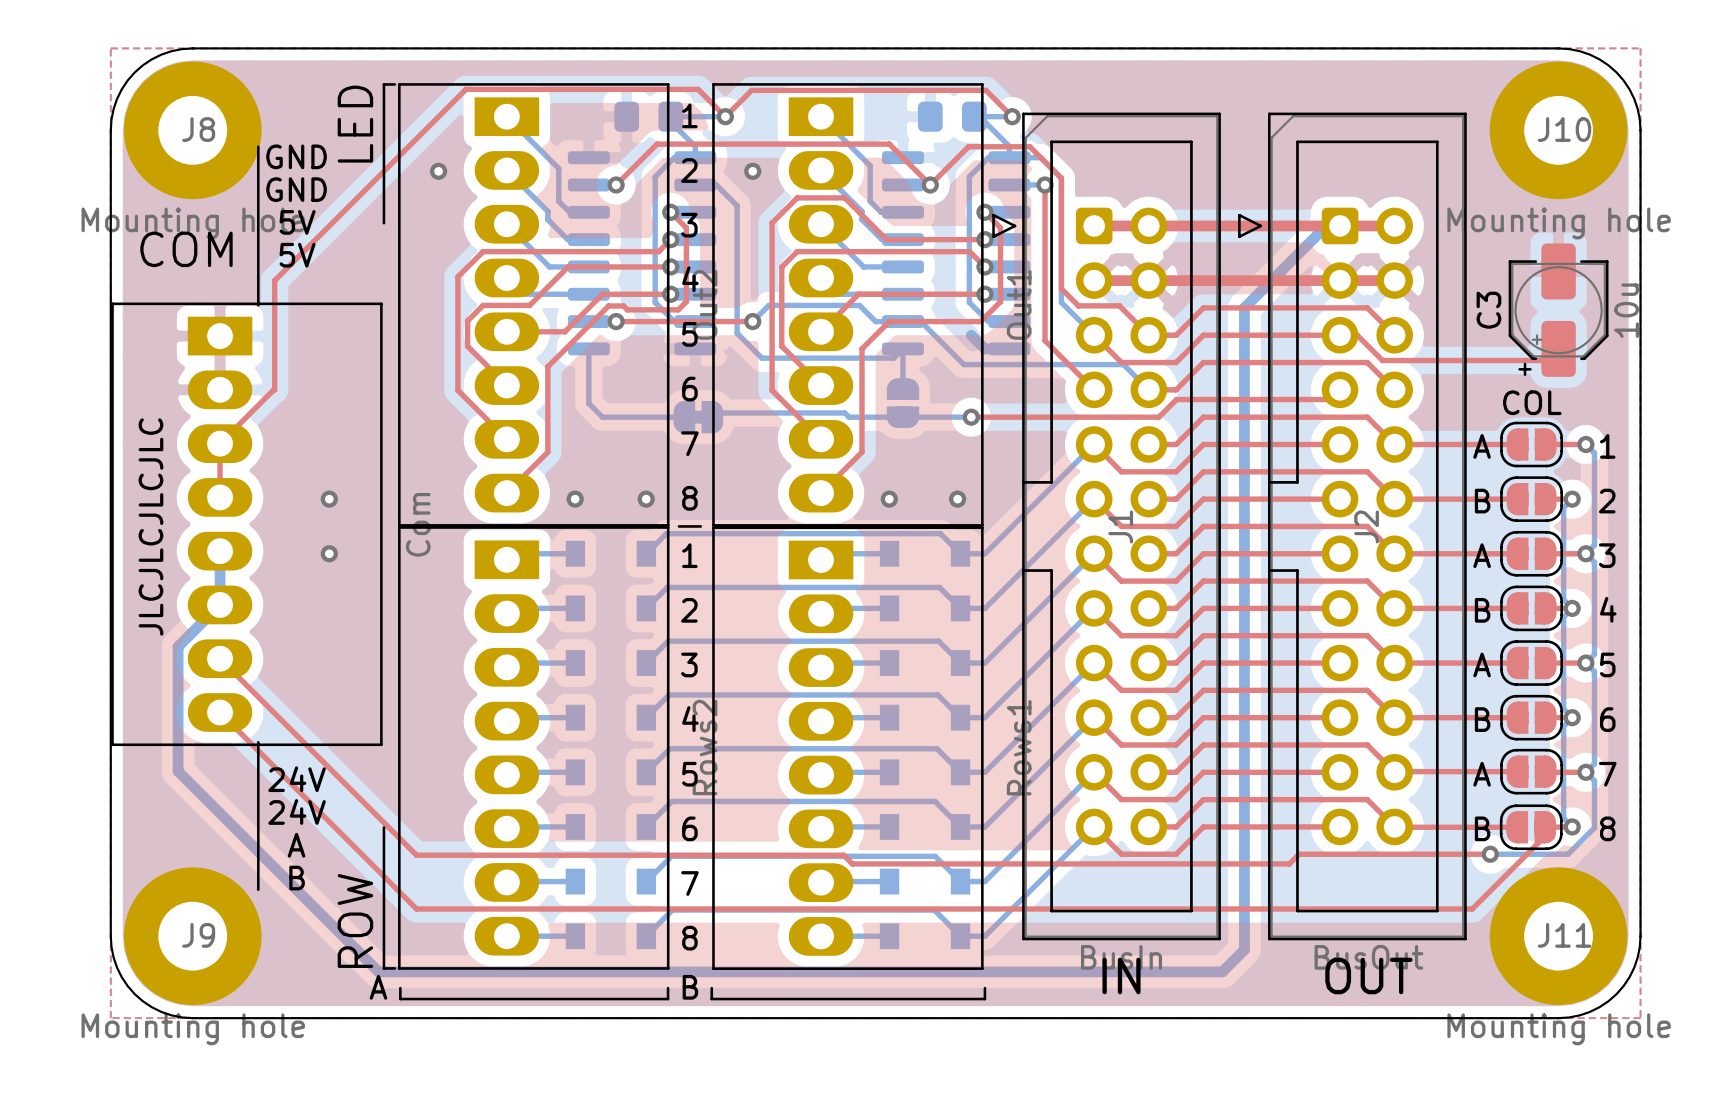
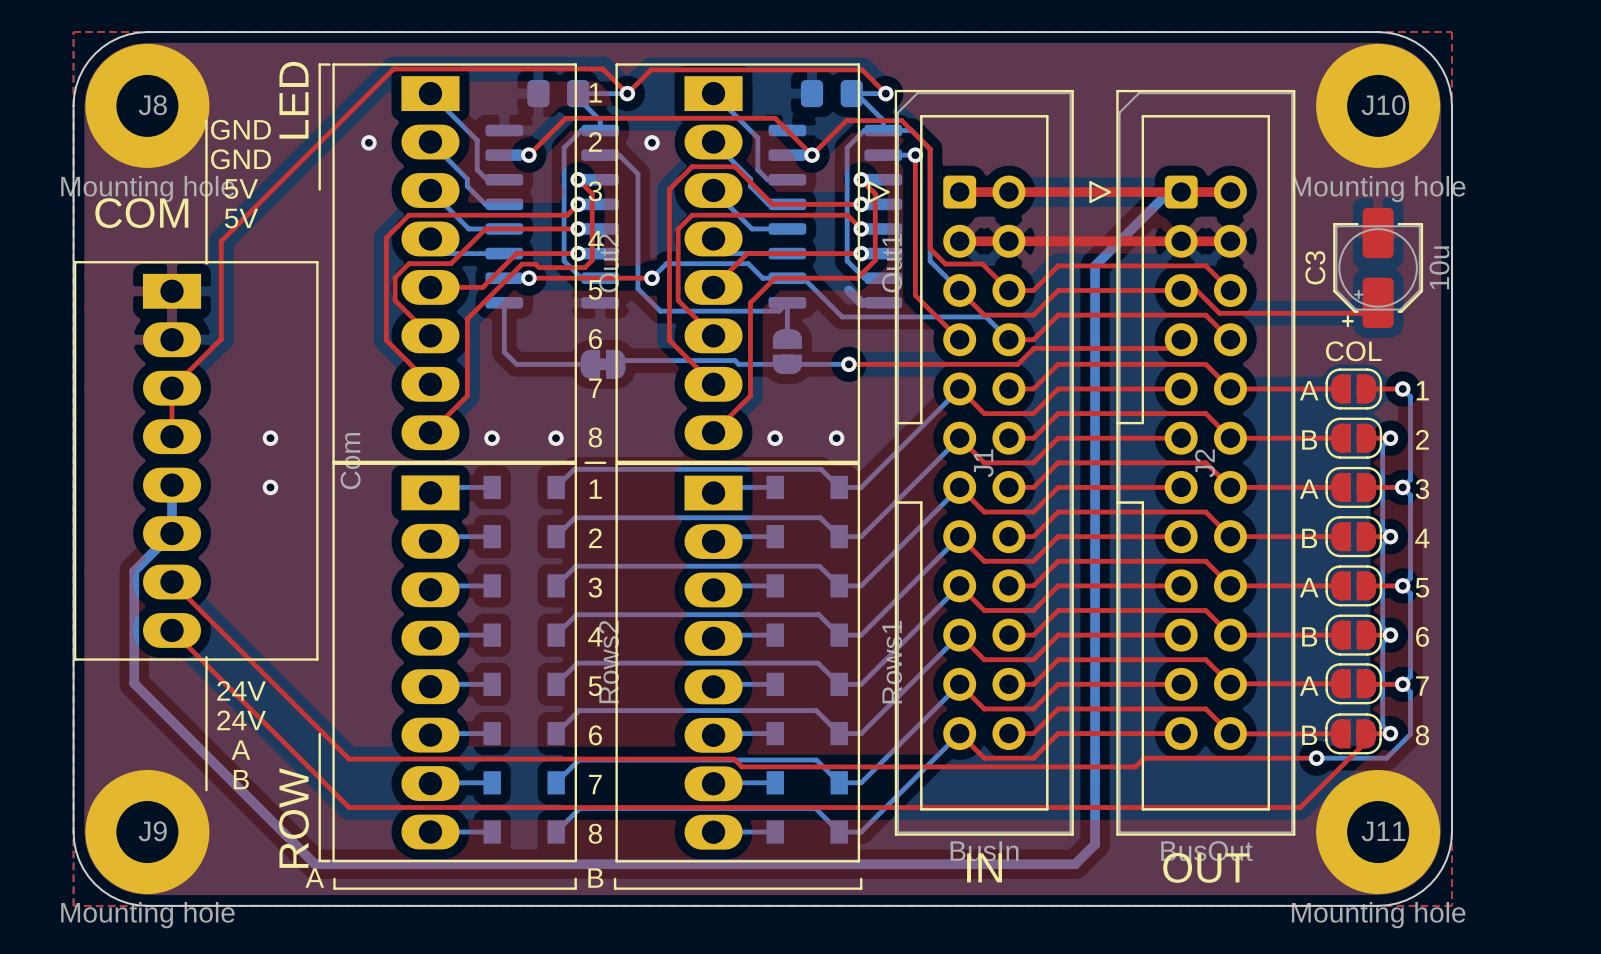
text: JLCJLCJLCJLC (150, 526) -> none

